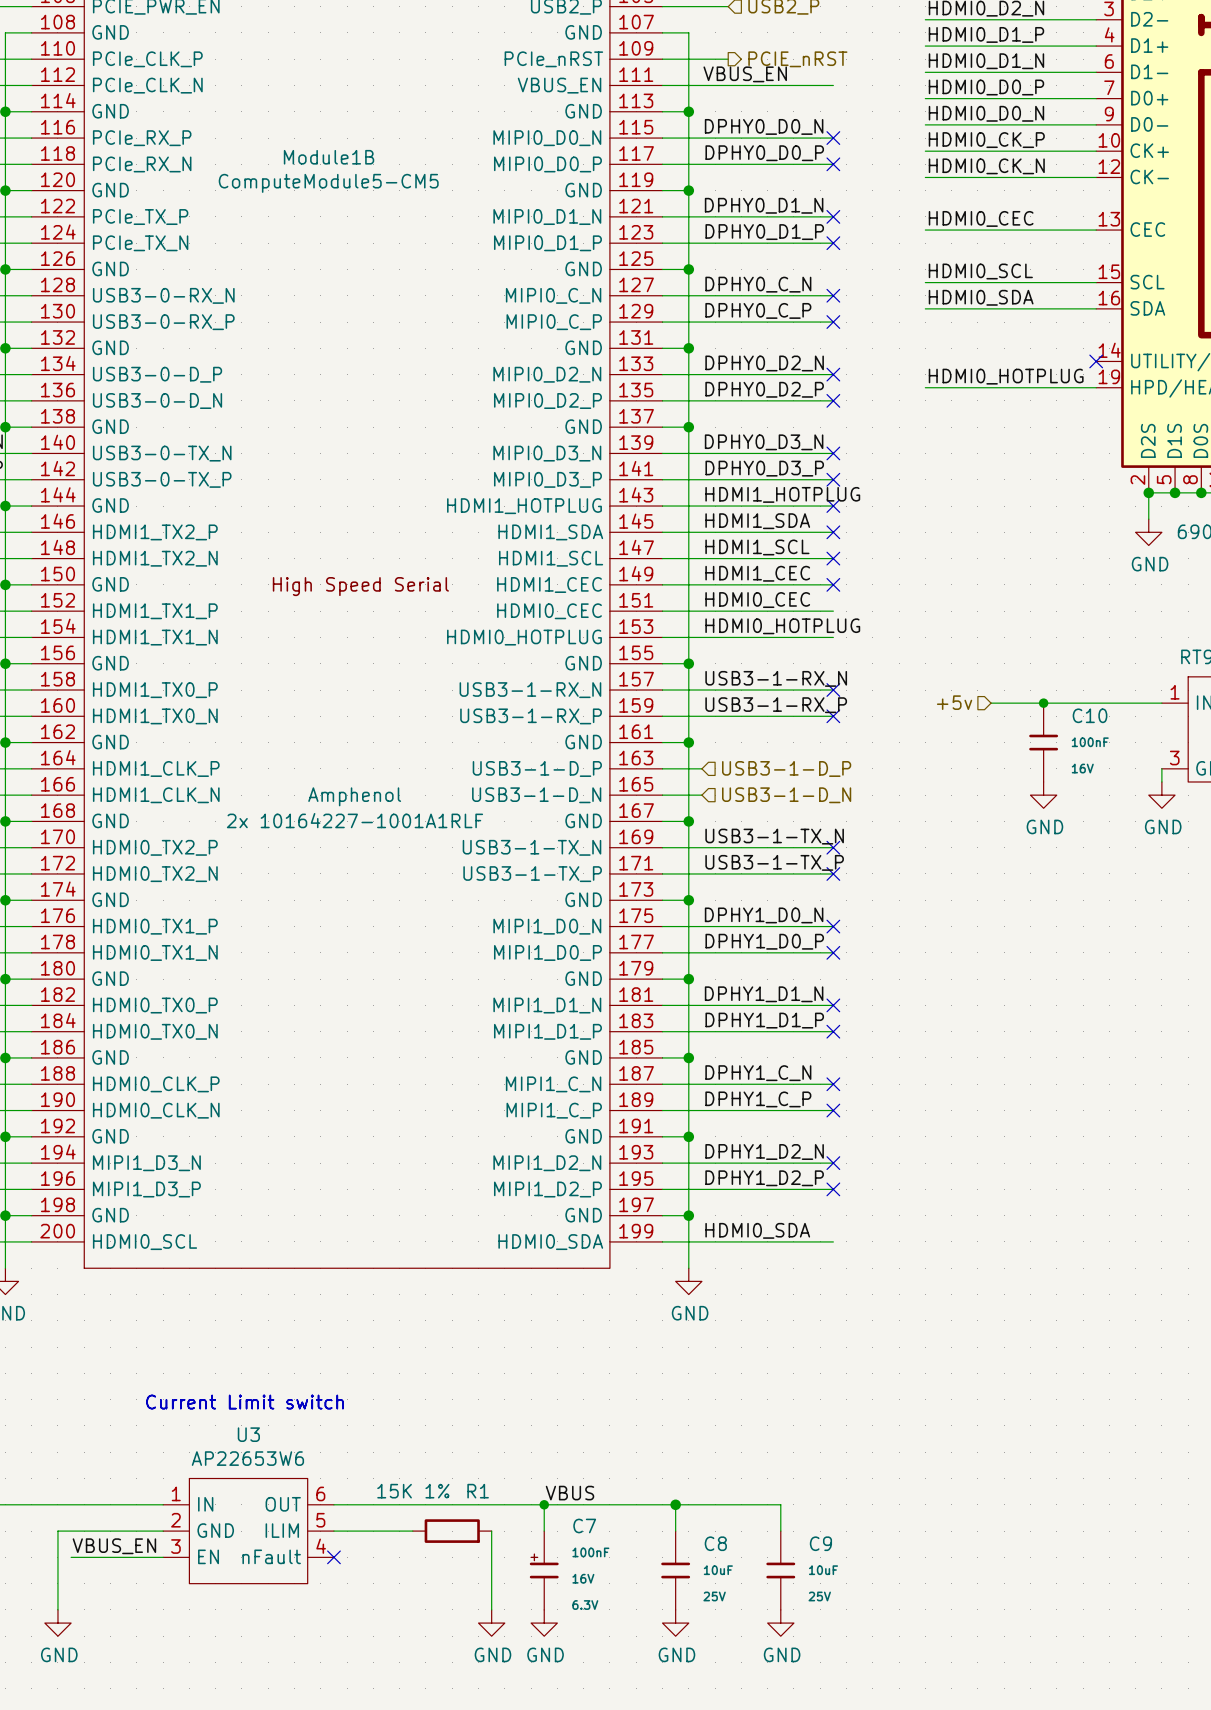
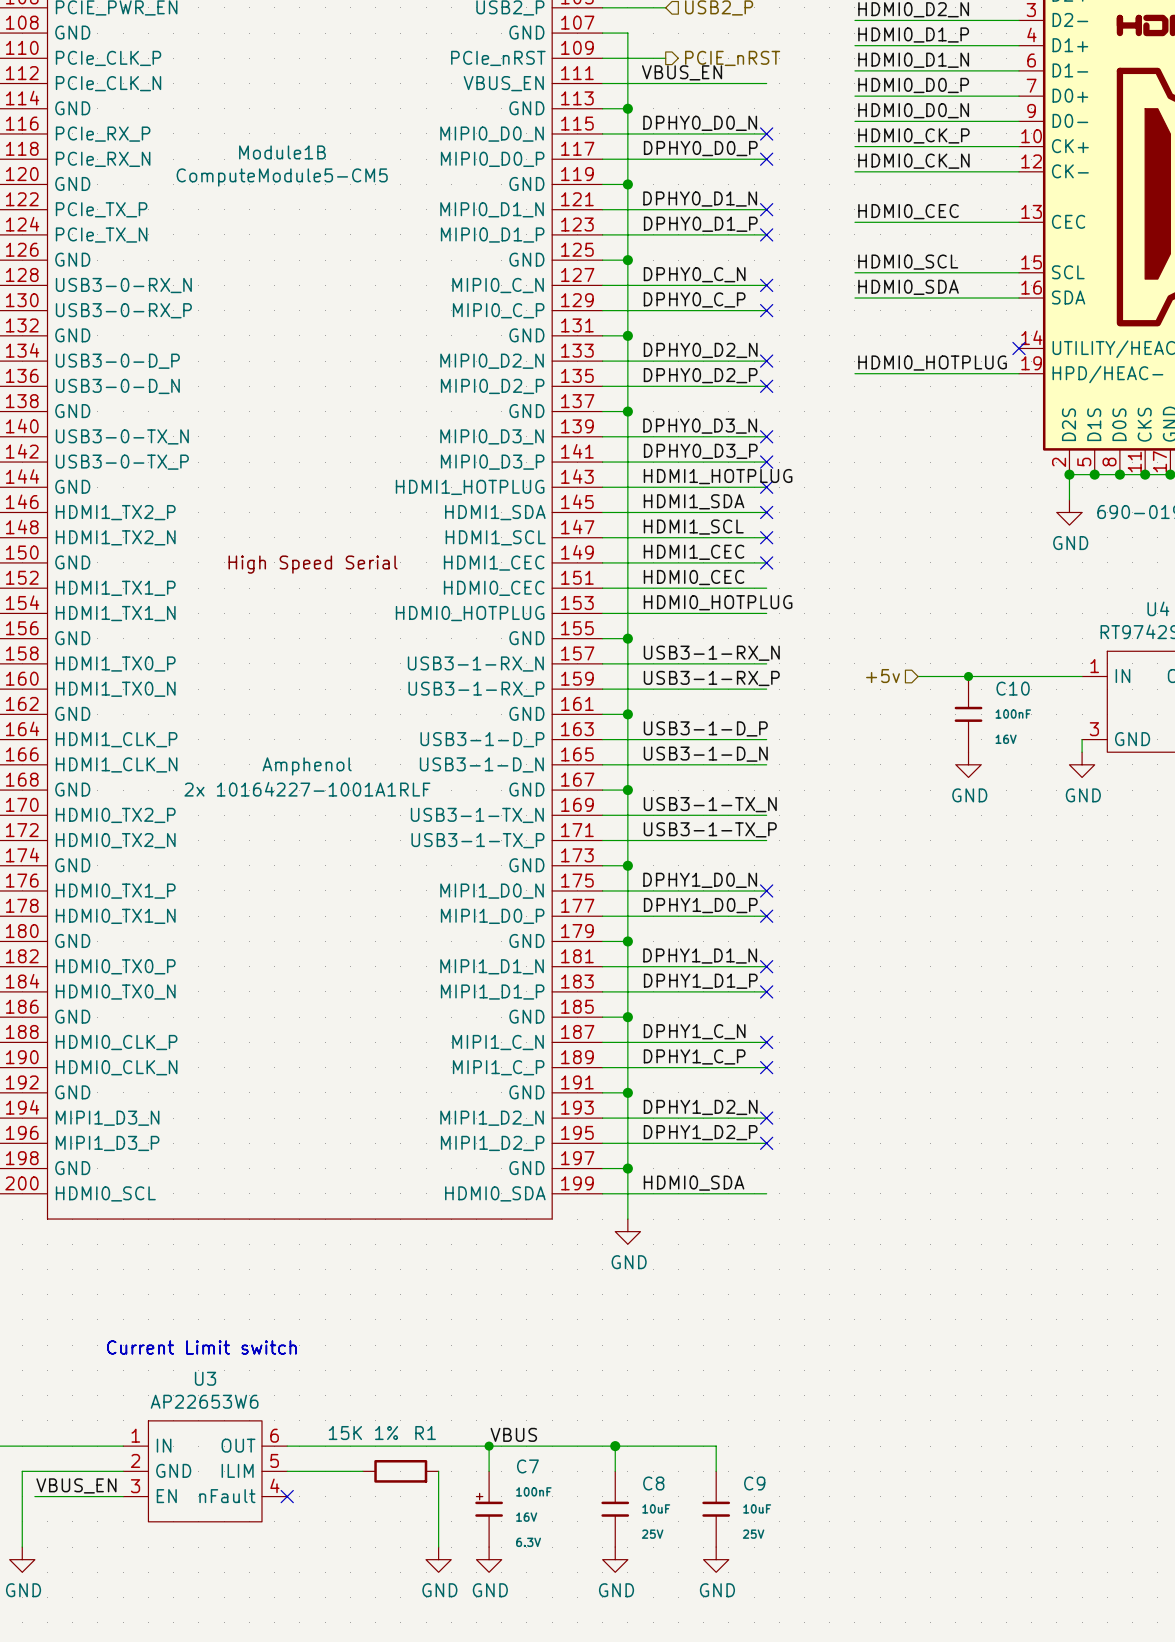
no-connect mark: (833, 690) -> none
no-connect mark: (833, 716) -> none
label: none -> USB3-1-D_P (705, 728)
wire: none -> (640, 739) (766, 739)
hierarchical label: USB3-1-D_P (786, 768) -> none
label: none -> USB3-1-D_N (705, 754)
wire: none -> (640, 764) (766, 764)
hierarchical label: USB3-1-D_N (786, 795) -> none
no-connect mark: (833, 847) -> none
no-connect mark: (833, 873) -> none

